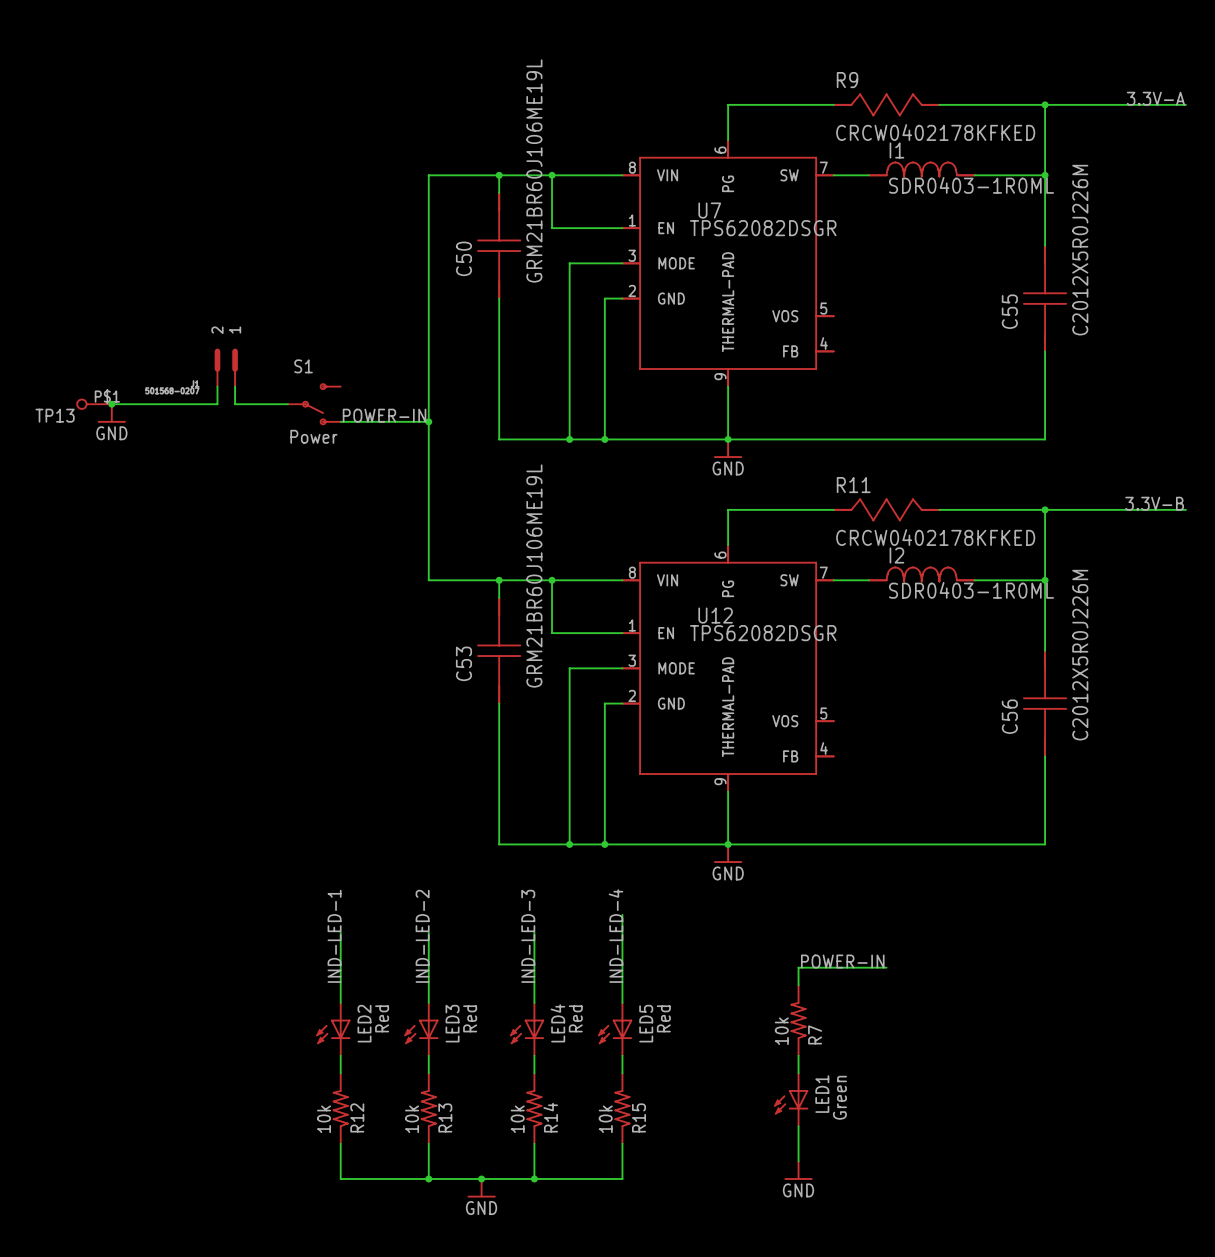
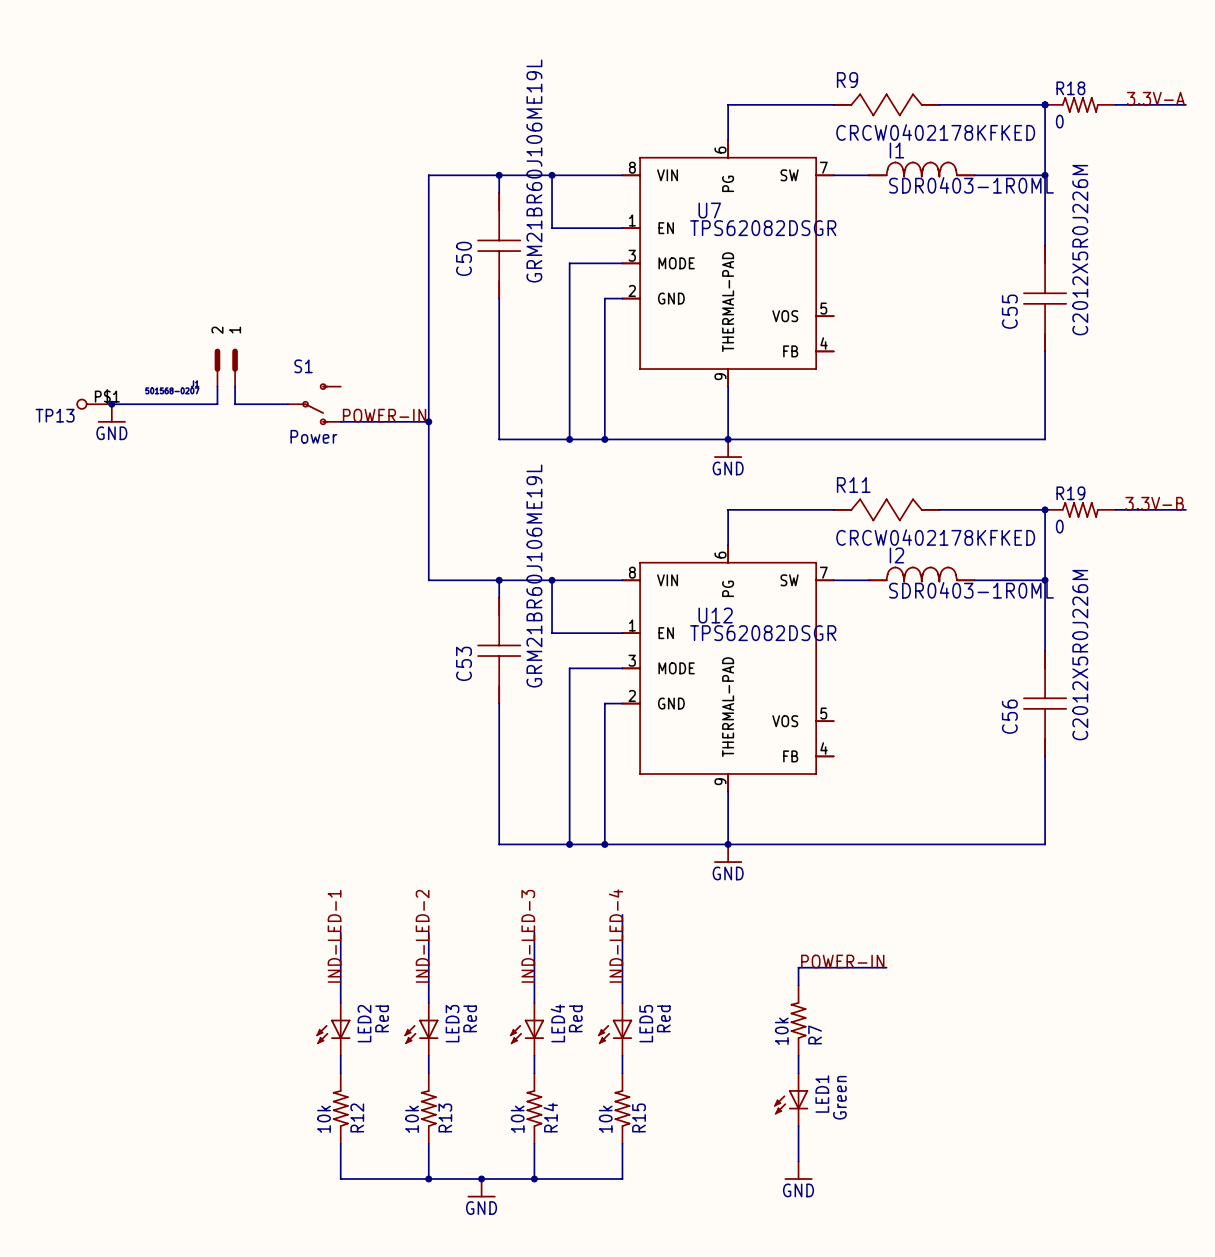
R18: none -> 0 (1080, 104)
R19: none -> 0 (1080, 509)

